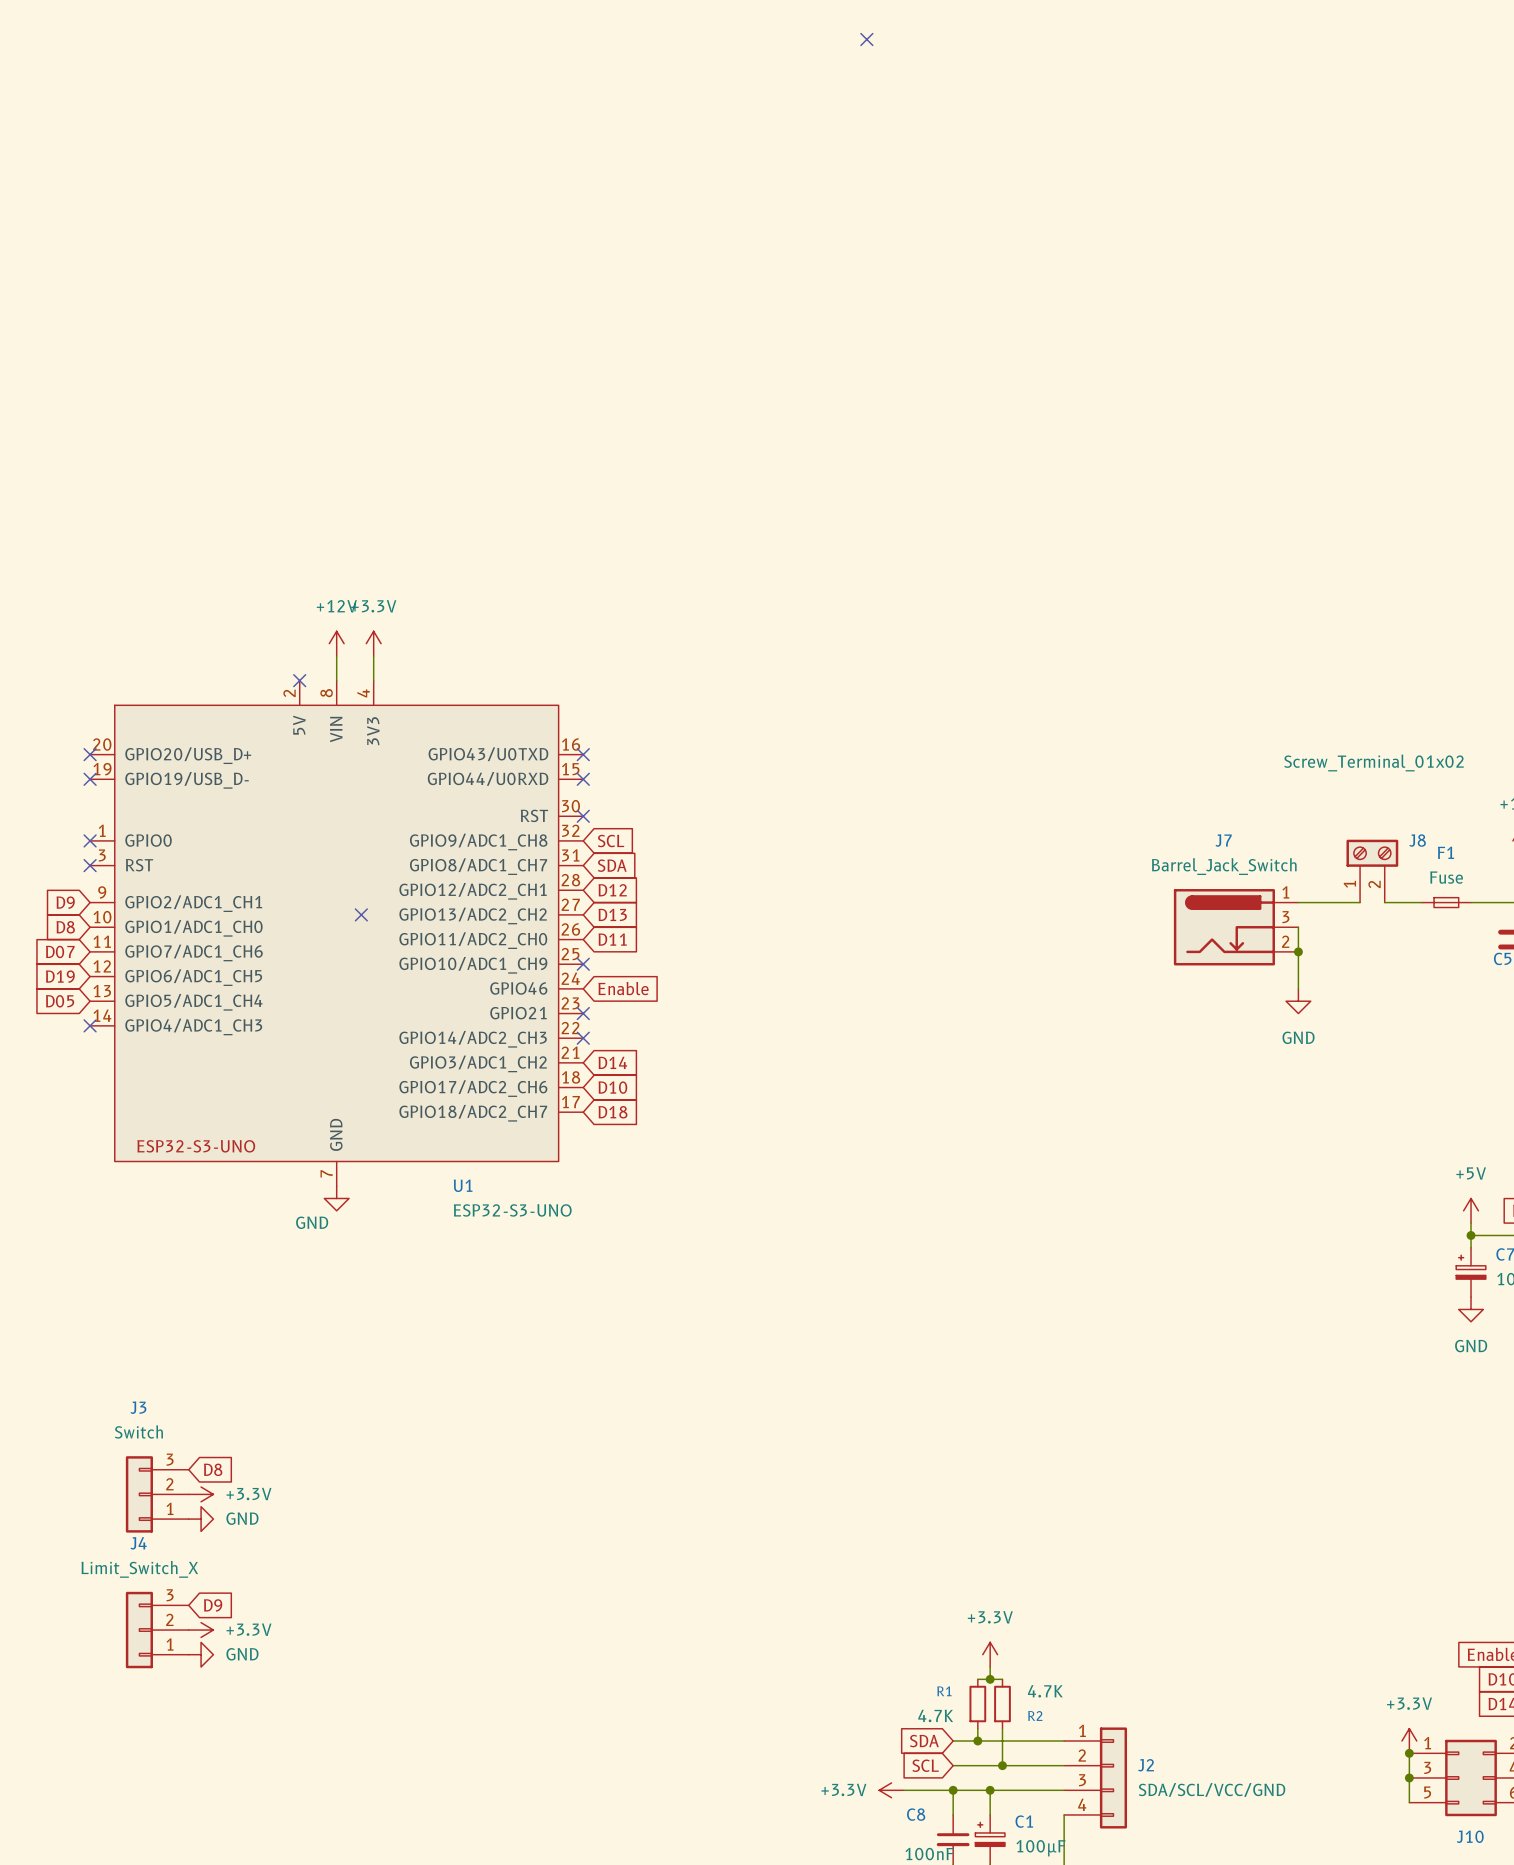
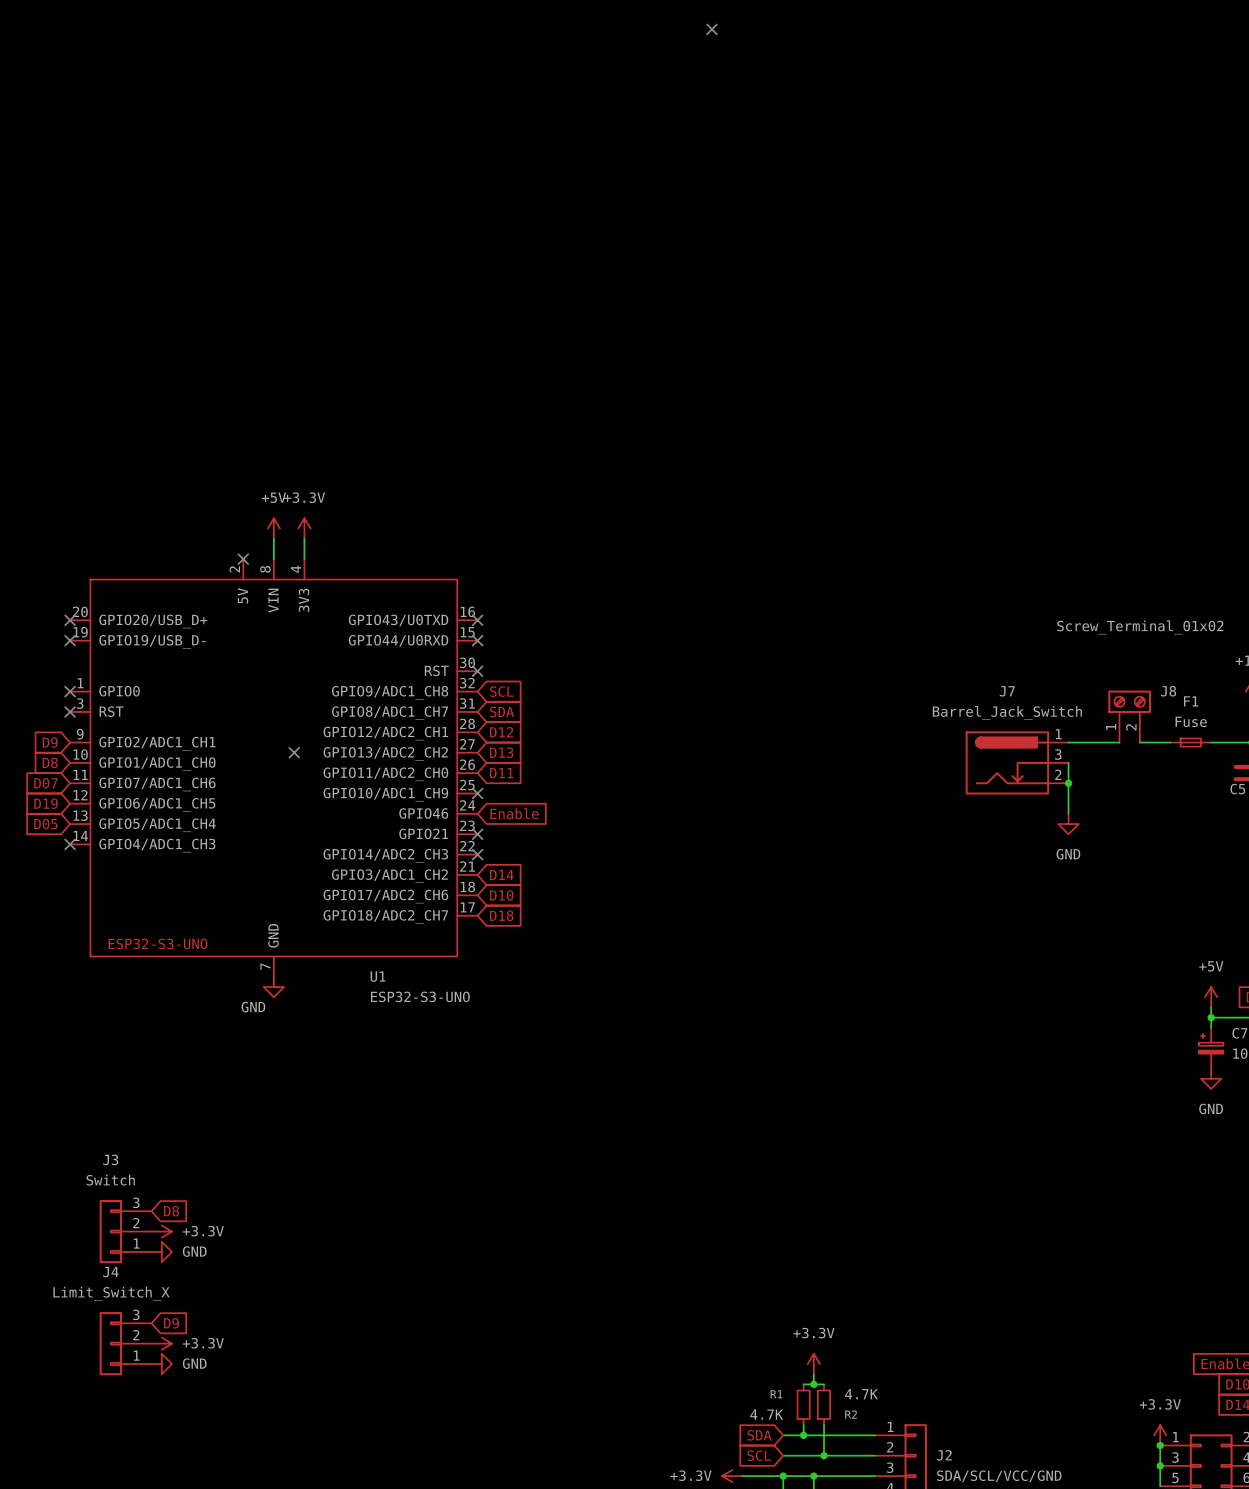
power symbol: +12V (336, 643) -> +5V (273, 528)

